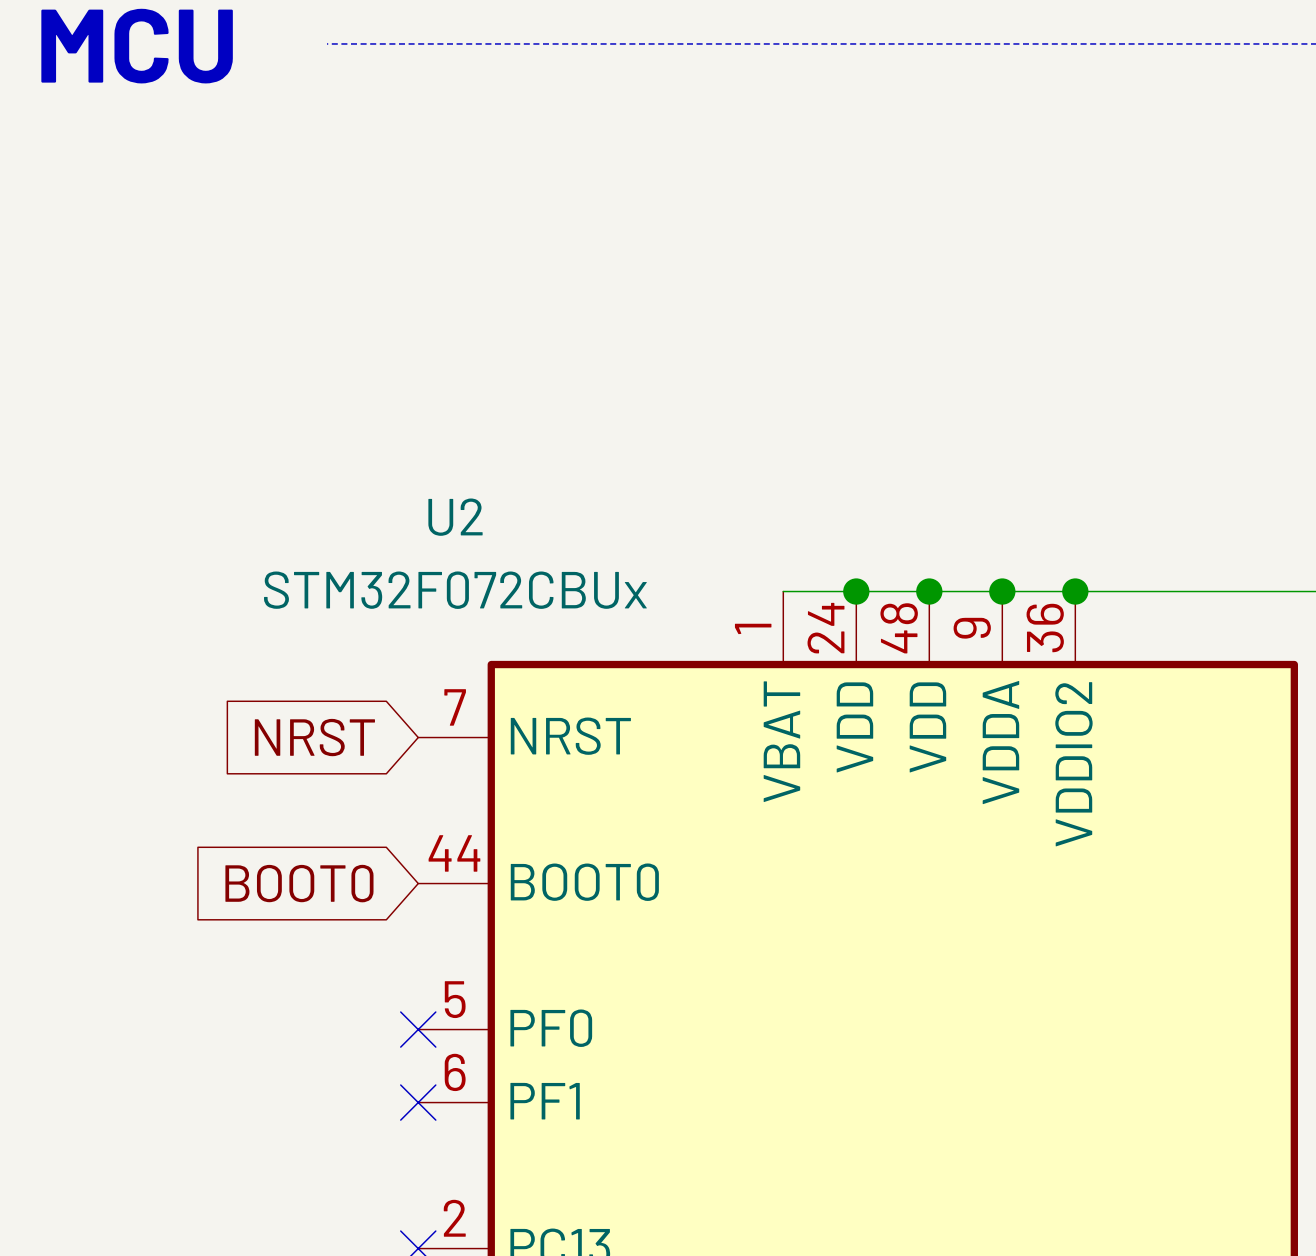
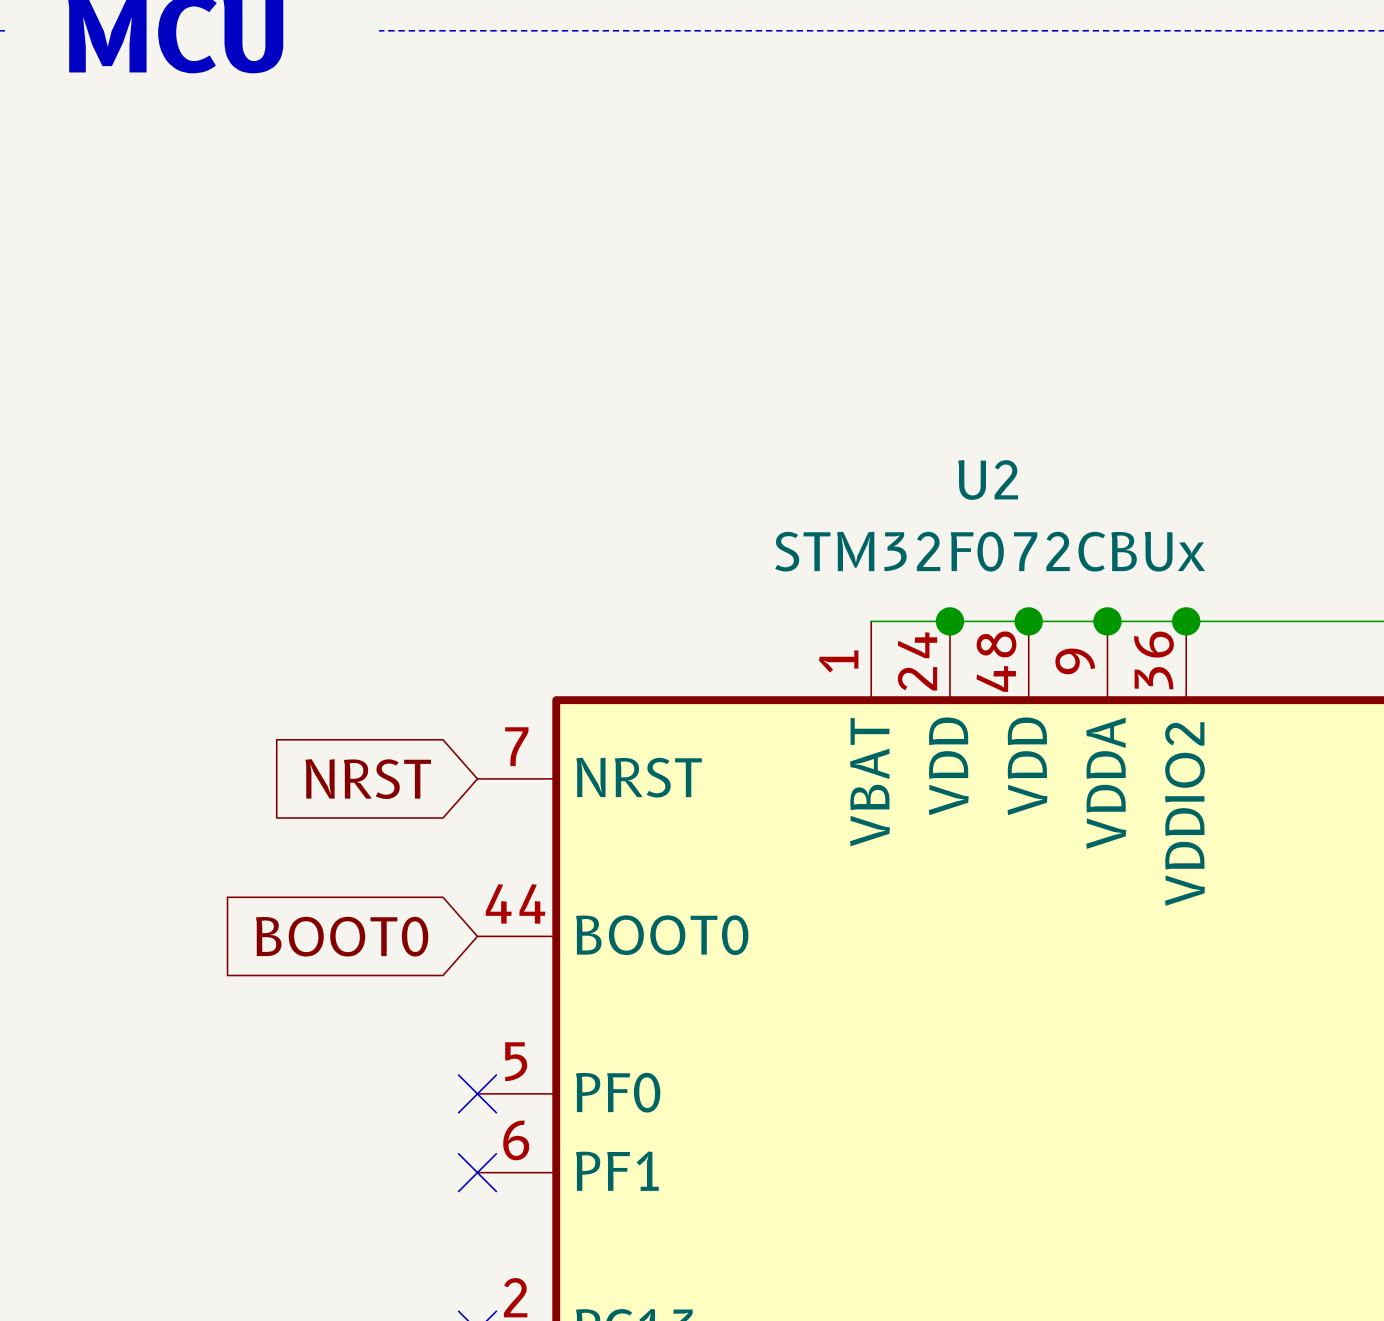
U2 name position: U2 (455, 517) -> U2 (988, 479)
U2 value position: STM32F072CBUx (455, 590) -> STM32F072CBUx (990, 551)

